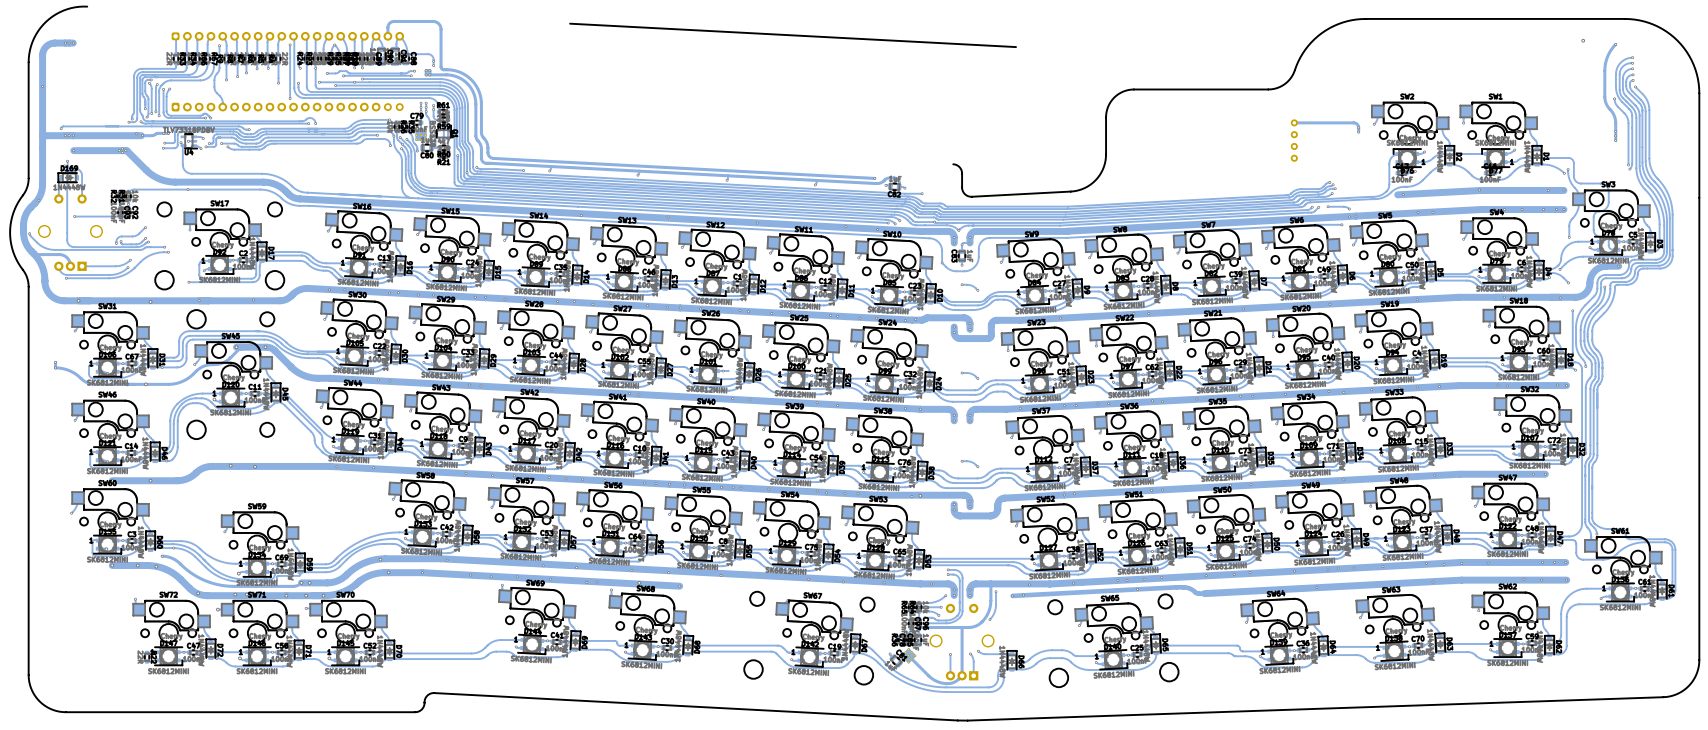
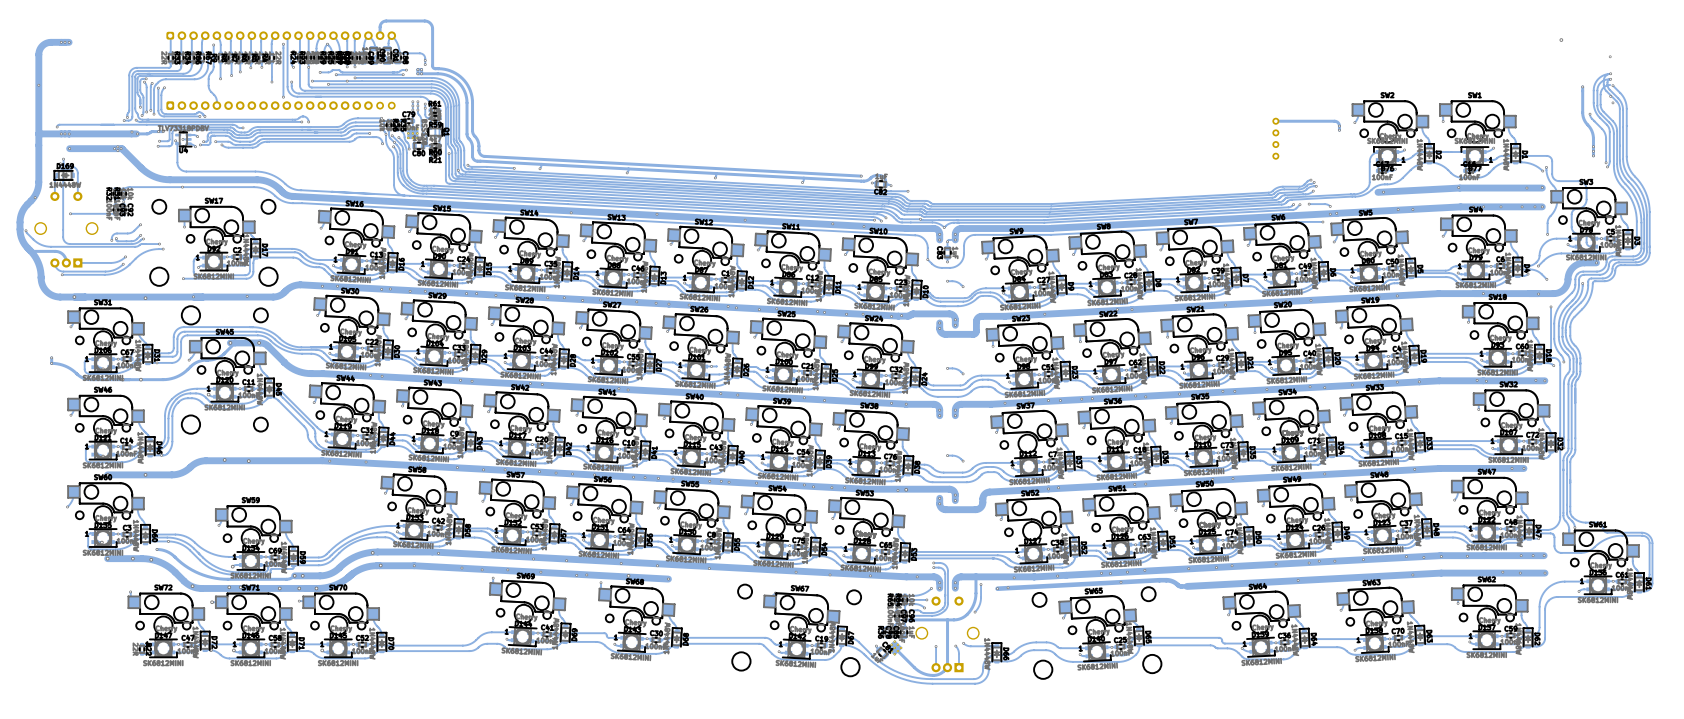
board edge: (87, 6) (70, 8) (55, 14) (40, 27) (32, 42) (28, 62) (28, 180) (26, 189) (14, 209) (10, 228) (13, 252) (26, 275) (28, 284) (28, 678) (35, 696) (50, 708) (65, 712) (415, 712) (422, 708) (427, 695) (434, 693) (967, 720) (1663, 697) (1678, 693) (1692, 680) (1698, 669) (1699, 660) (1699, 88) (1696, 74) (1689, 56) (1680, 44) (1666, 31) (1648, 22) (1629, 19) (1351, 20) (1333, 26) (1314, 39) (1302, 53) (1290, 78) (1276, 88) (1133, 89) (1118, 94) (1110, 101) (1106, 111) (1105, 157) (1102, 169) (1093, 182) (1080, 189) (969, 196) (962, 190) (960, 169) (953, 164) -> none
board edge: (570, 23) (1016, 47) -> none
track: (1615, 44) (1605, 62) (1604, 88) -> none
via: (1615, 44) -> none
track: (1632, 57) (1620, 62) (1615, 74) (1617, 95) (1631, 113) (1632, 133) -> (1610, 73) (1598, 78) (1593, 90) (1595, 110) (1608, 126) (1609, 131)
track: (1632, 63) (1626, 64) (1620, 69) (1619, 91) (1621, 96) (1635, 111) (1636, 135) -> (1610, 79) (1603, 80) (1598, 85) (1597, 106) (1600, 113) (1611, 124) (1613, 133)
via: (1632, 63) -> none
track: (1632, 68) (1626, 70) (1623, 74) (1622, 89) (1625, 95) (1638, 110) (1639, 132) -> (1610, 84) (1604, 86) (1601, 90) (1600, 106) (1615, 124) (1617, 131)
via: (1632, 68) -> none
via: none -> (1582, 86)
track: (1604, 96) (1606, 103) (1615, 119) (1615, 140) -> (1582, 95) (1583, 117) (1593, 134) (1593, 155)
via: none -> (1610, 96)
track: (1614, 98) (1616, 105) (1627, 119) (1628, 140) -> (1590, 114) (1603, 130) (1606, 138)
via: (1614, 98) -> none
via: none -> (1612, 102)
via: none -> (1590, 114)
via: (1615, 131) -> none
via: (1615, 135) -> none
via: (1615, 140) -> none
via: none -> (1593, 146)
via: none -> (1593, 151)
via: none -> (1593, 155)

